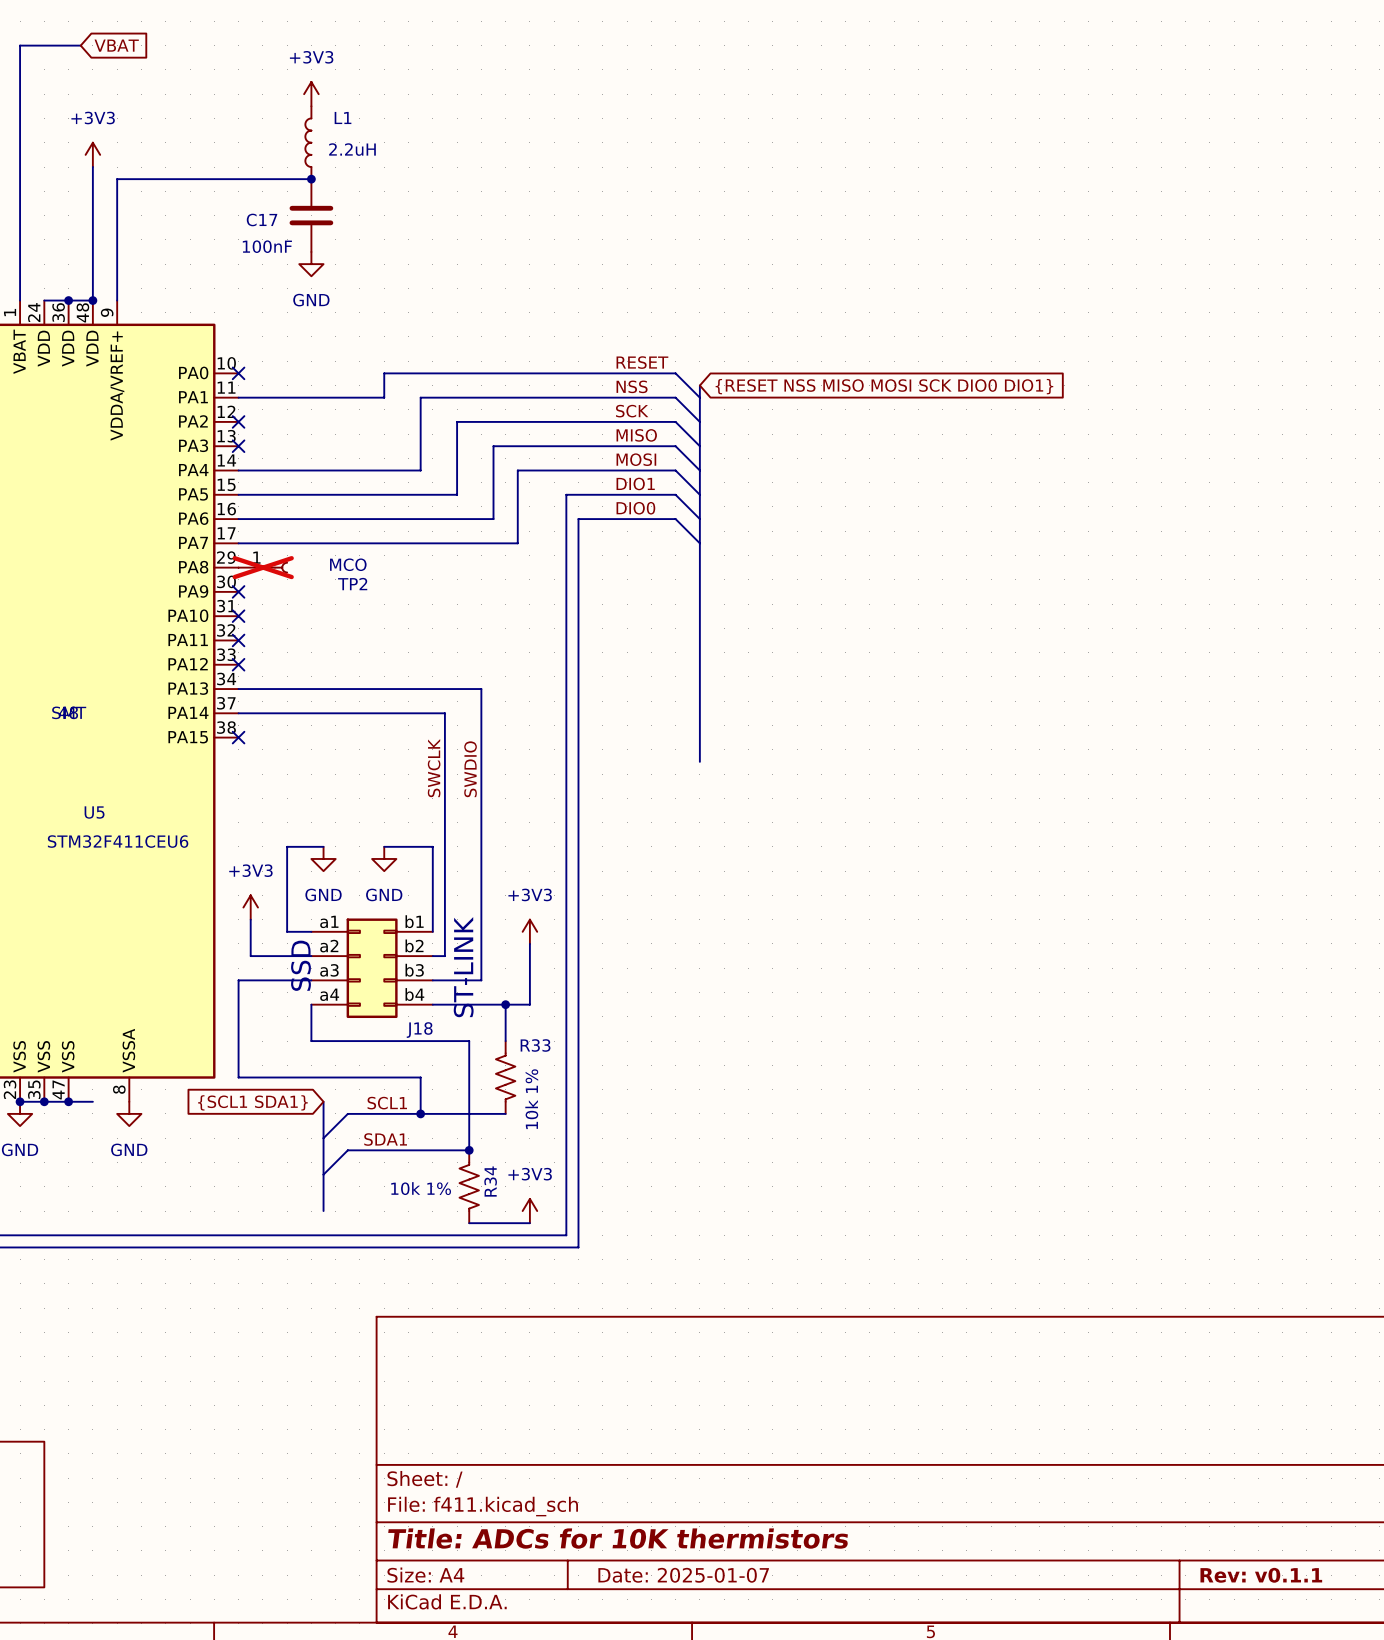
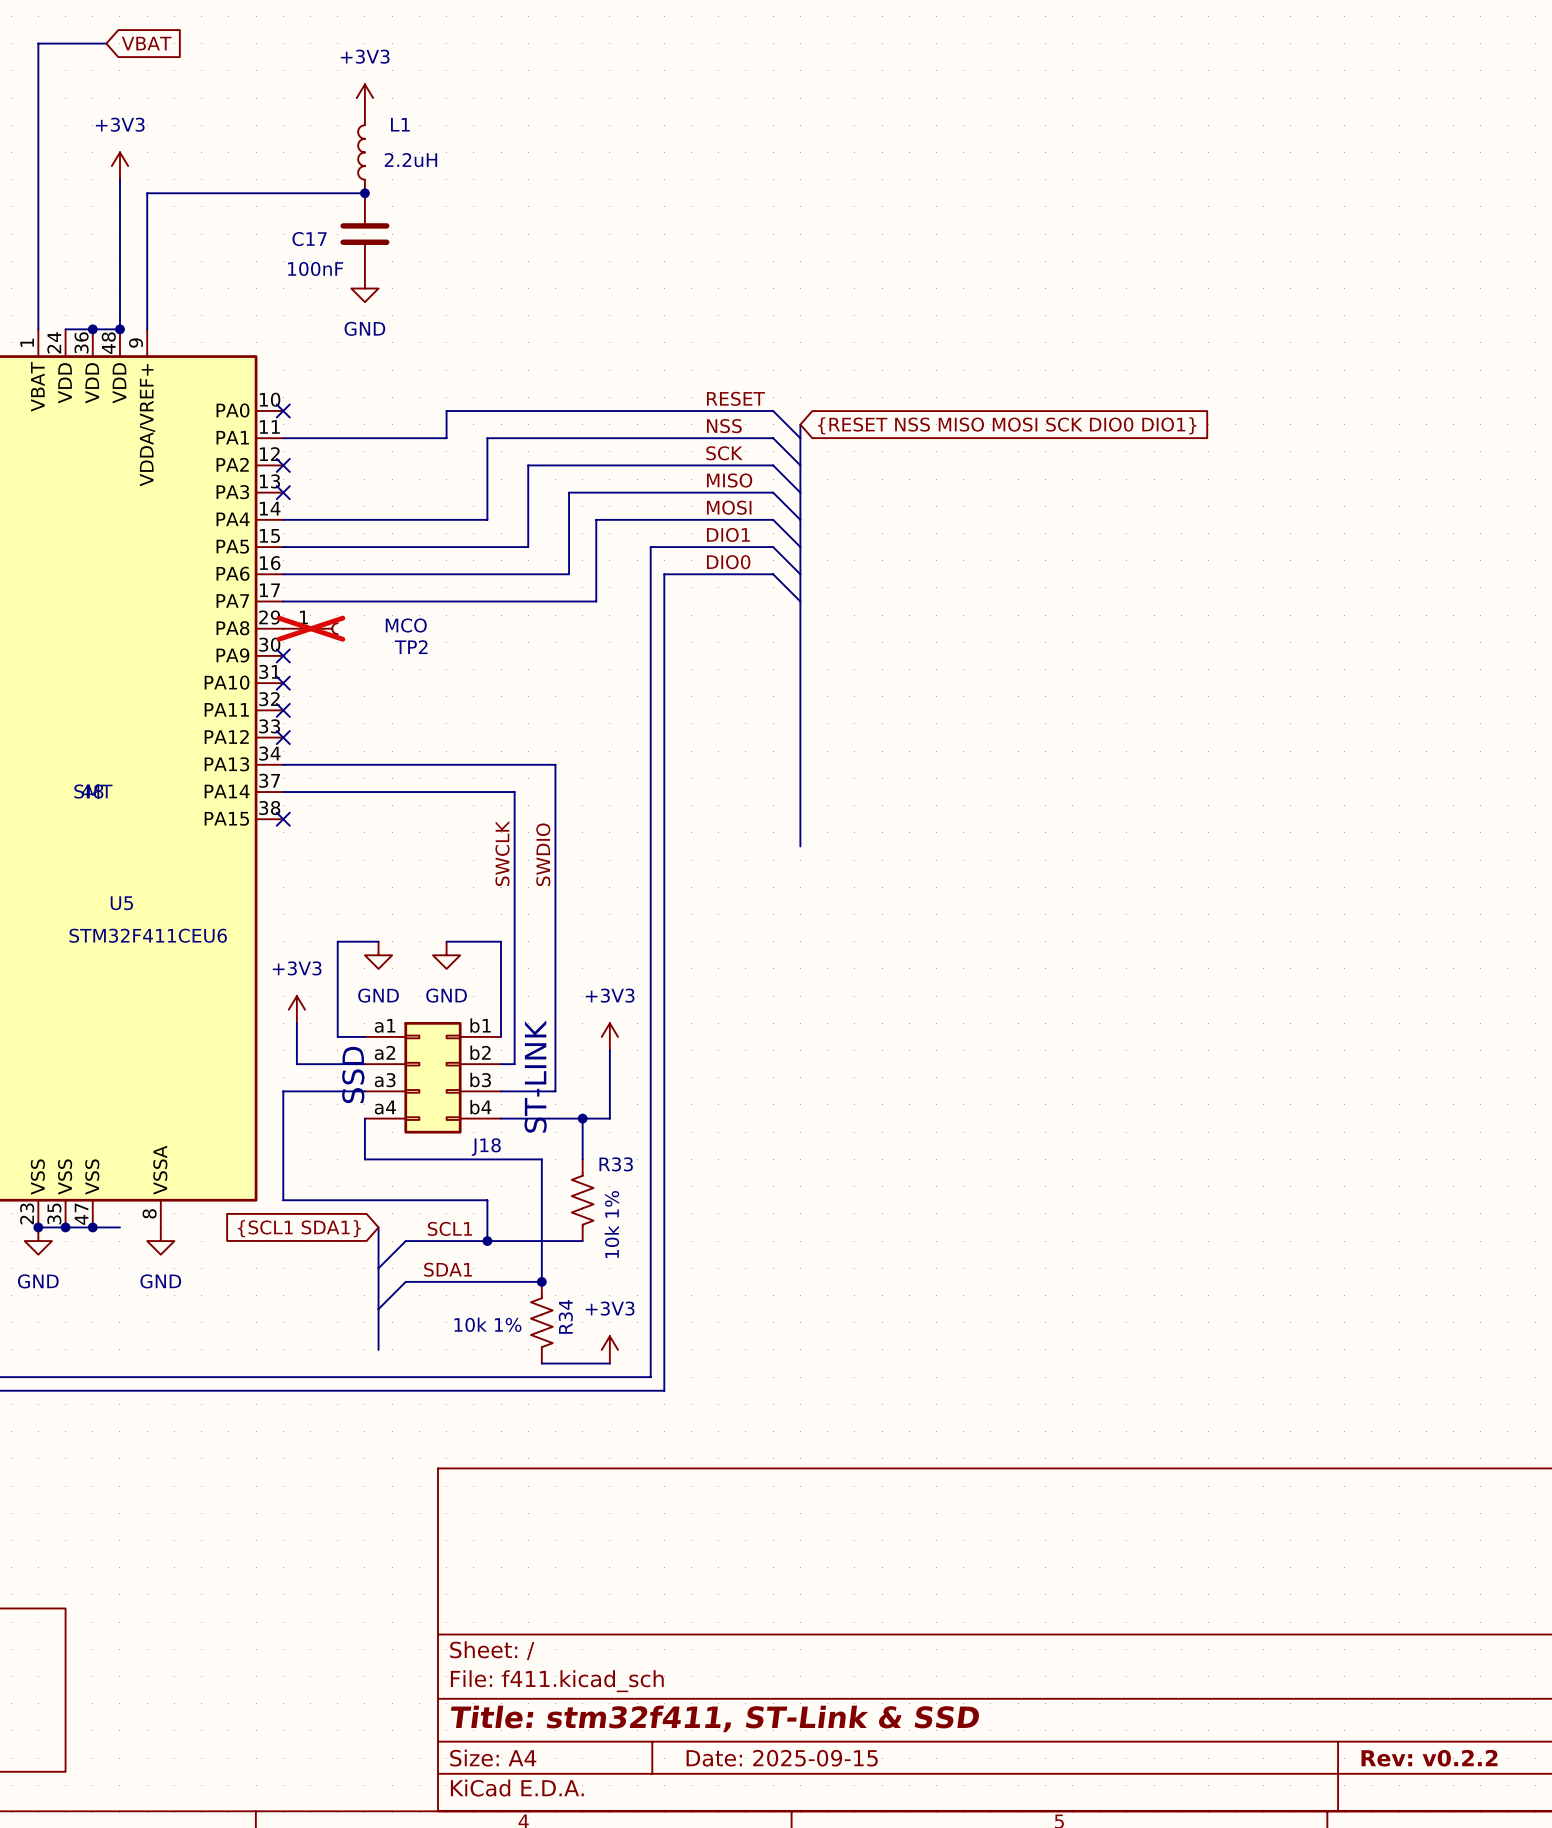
title block: Title: ADCs for 10K thermistors (618, 1538) -> Title: stm32f411, ST-Link & SSD (715, 1718)
title block: Date: 2025-01-07 (683, 1575) -> Date: 2025-09-15 (782, 1758)
title block: Rev: v0.1.1 (1261, 1575) -> Rev: v0.2.2 (1429, 1758)

